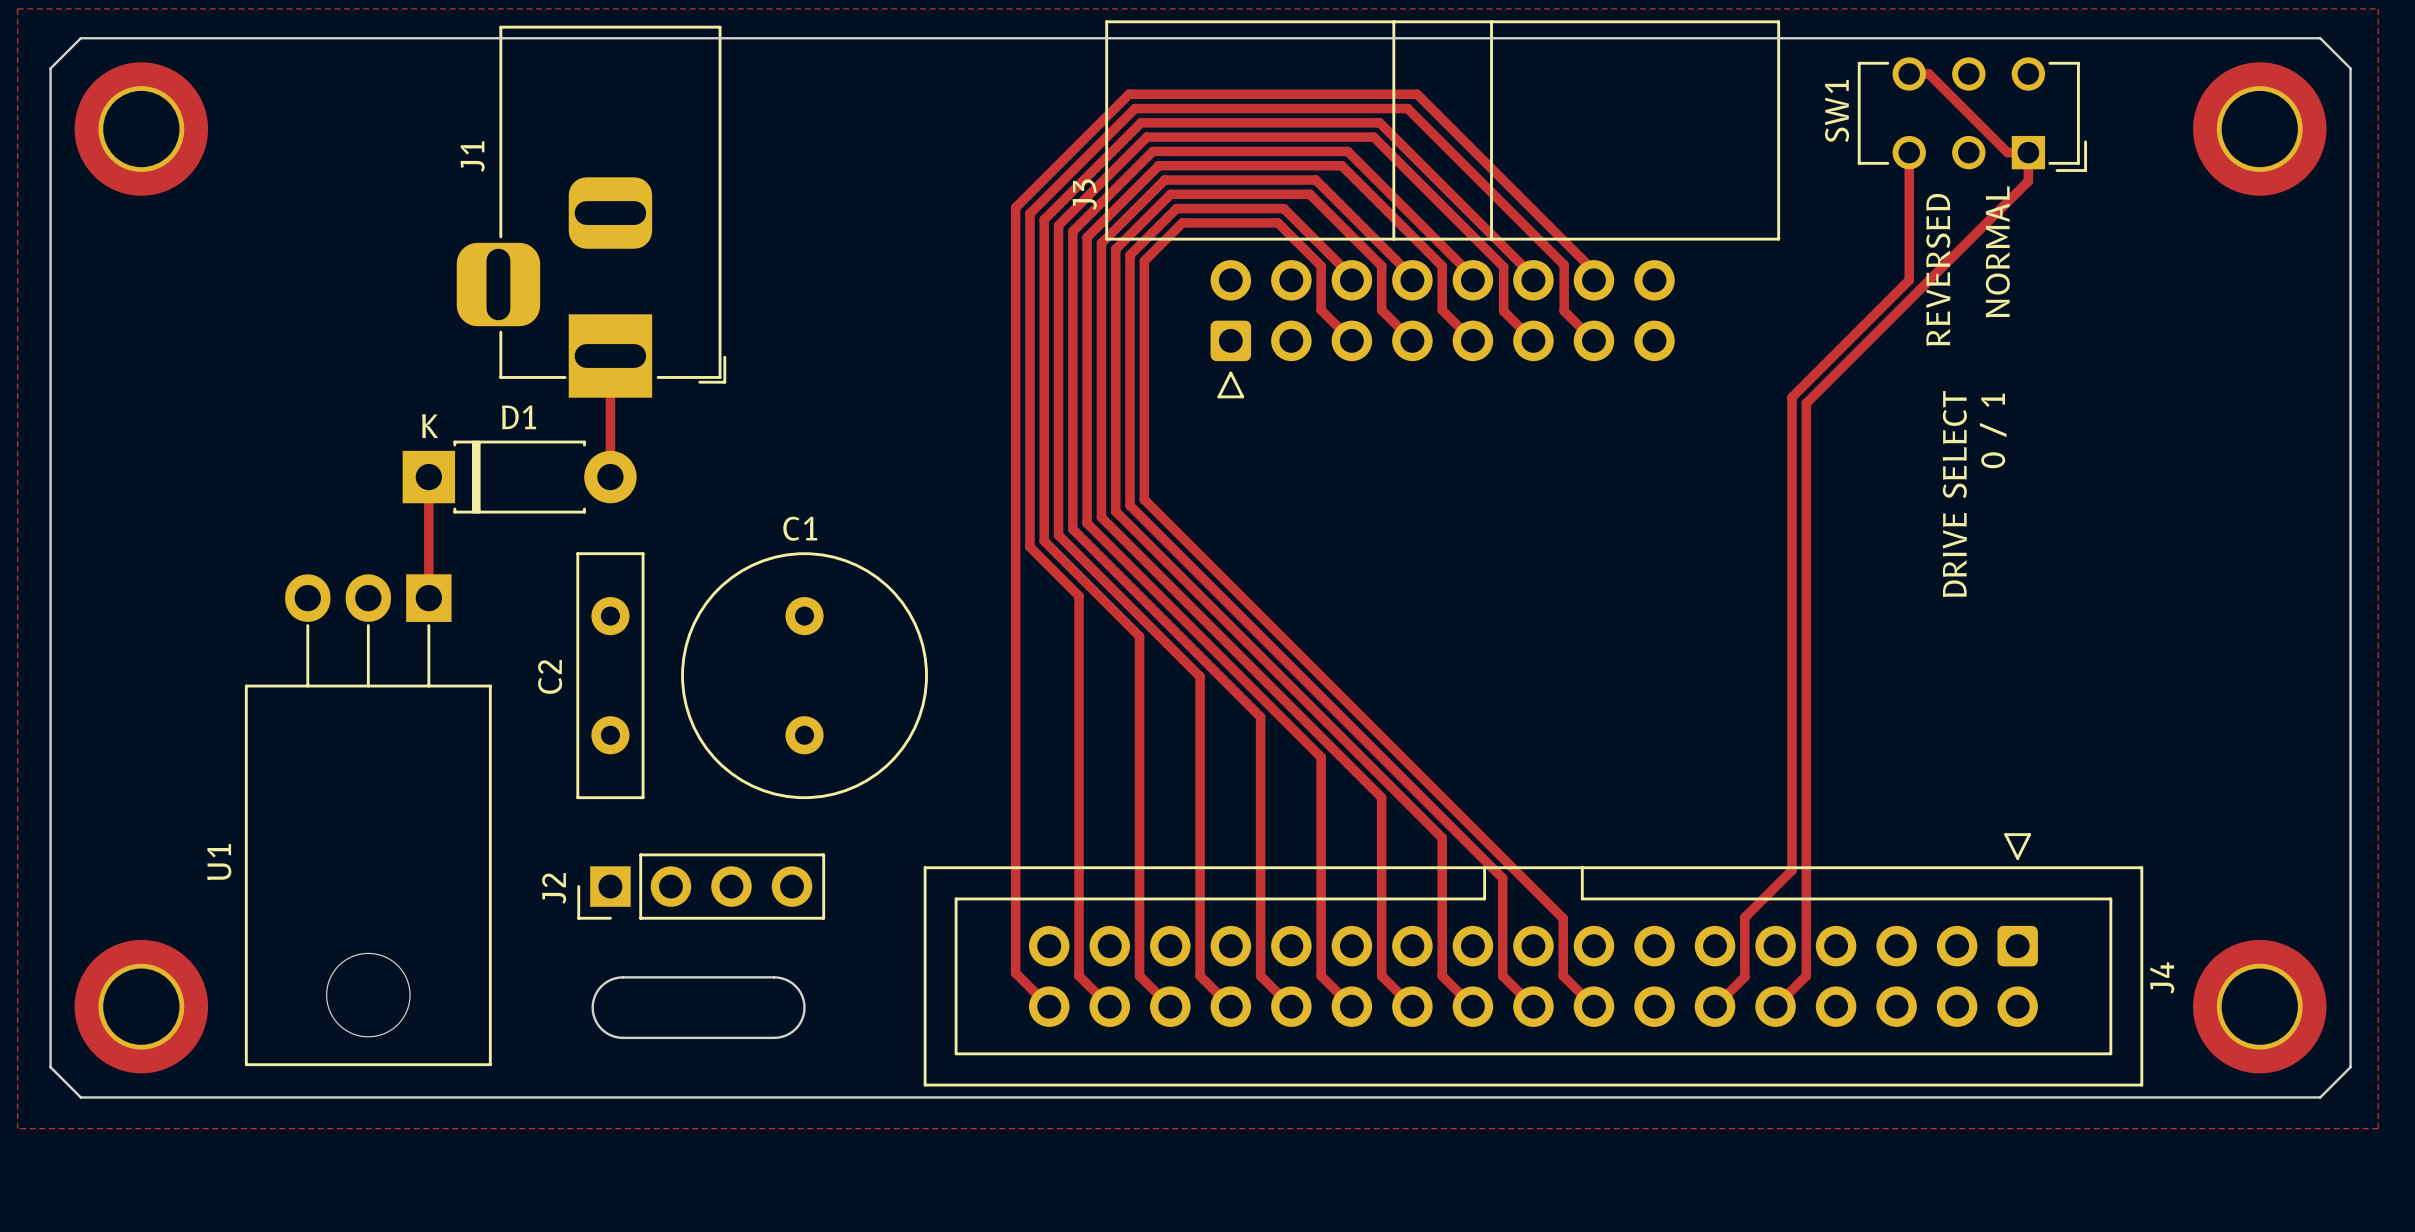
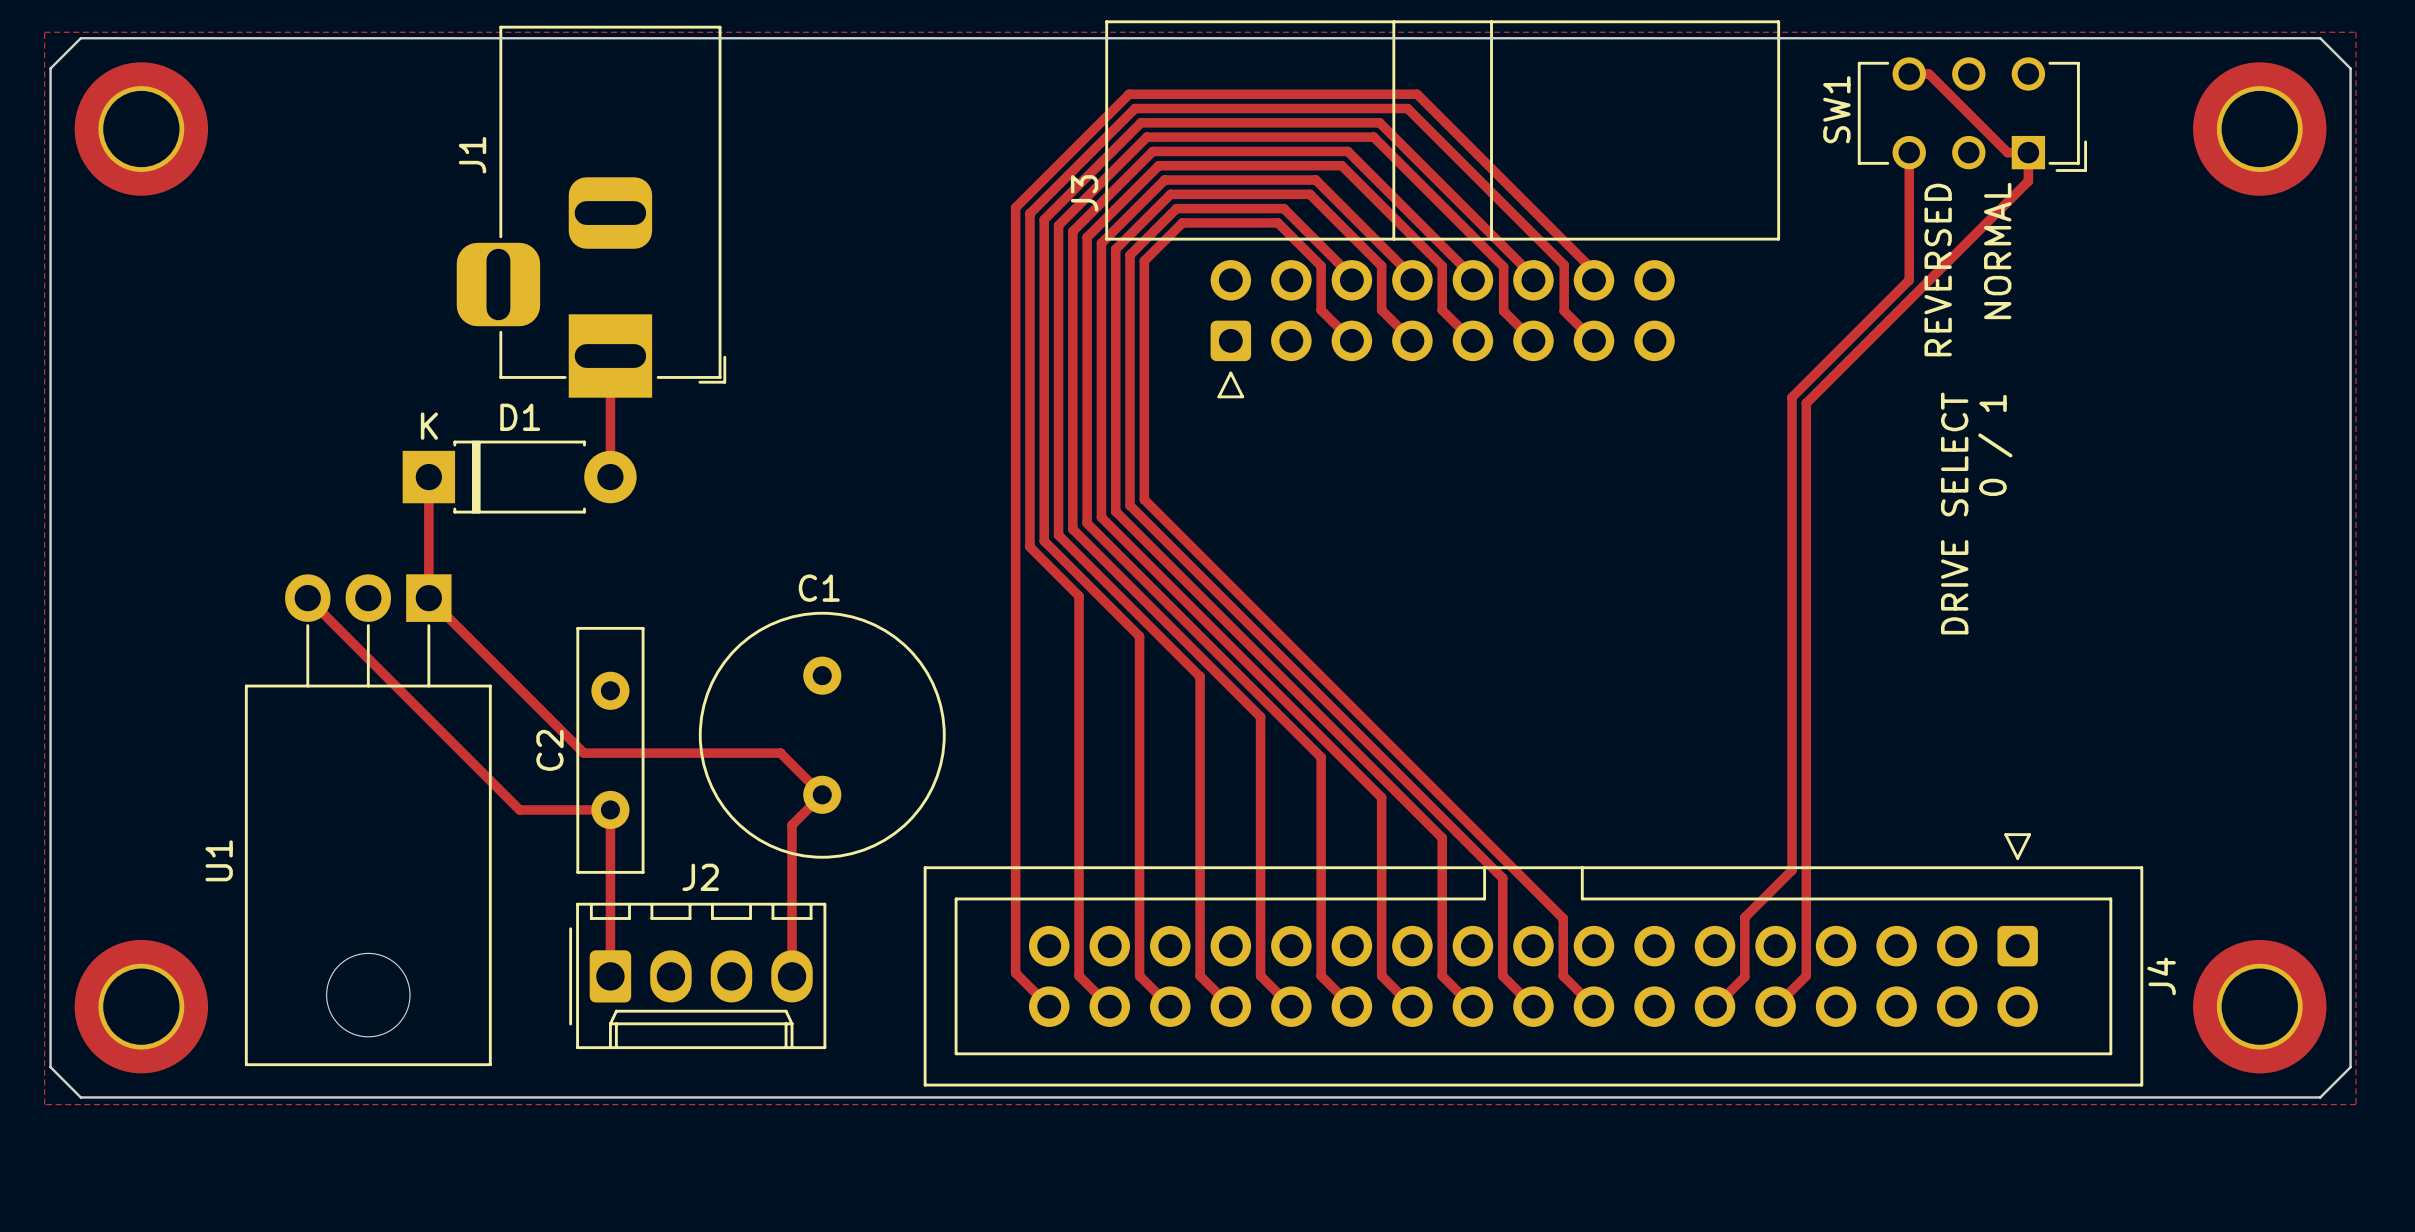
zone outline: (17, 8) (17, 1128) (2378, 1128) (2378, 8) (17, 8) -> (44, 32) (44, 1104) (2356, 1104) (2356, 32) (44, 32)
track: none -> (307, 598) (519, 809) (610, 809) (610, 976)
track: none -> (428, 598) (583, 753) (780, 753) (822, 794) (792, 825) (792, 976)
C2 position: (610, 675) -> (610, 750)
C1 position: (804, 675) -> (822, 735)
J2 footprint: [577, 853, 826, 920] -> [569, 902, 827, 1050]
J2 name position: J2 (554, 888) -> J2 (700, 877)
board edge: (622, 977) (782, 978) (792, 983) (800, 992) (804, 1003) (803, 1015) (800, 1022) (792, 1031) (778, 1037) (615, 1036) (607, 1033) (598, 1026) (593, 1015) (592, 1003) (596, 992) (604, 983) (615, 978) (622, 977) -> none

